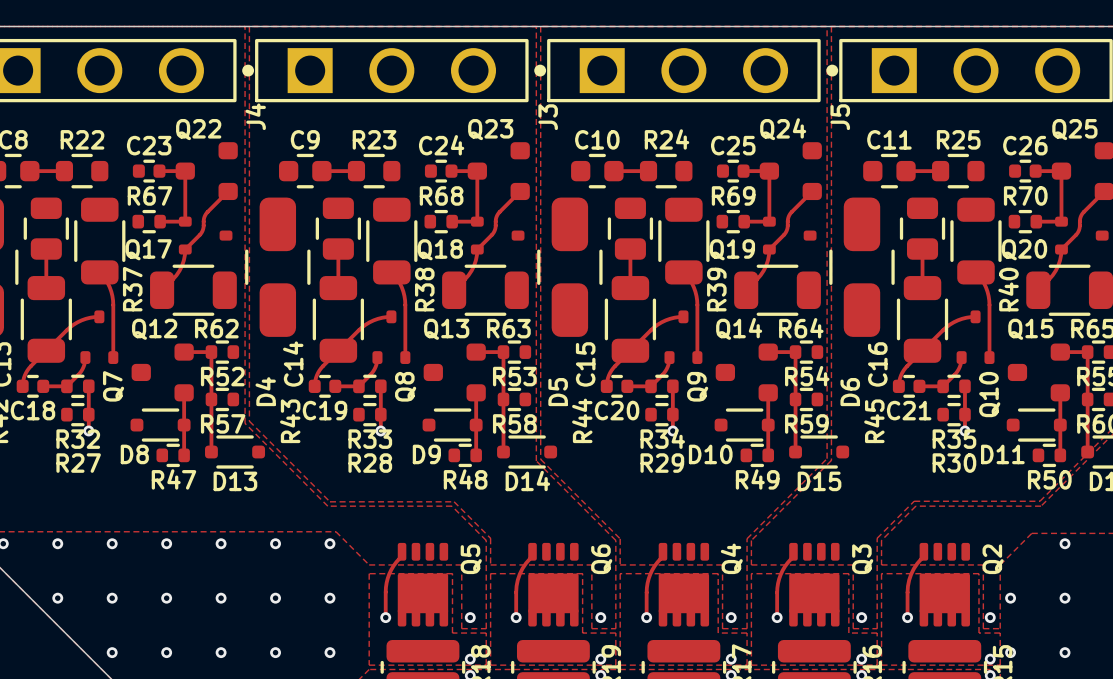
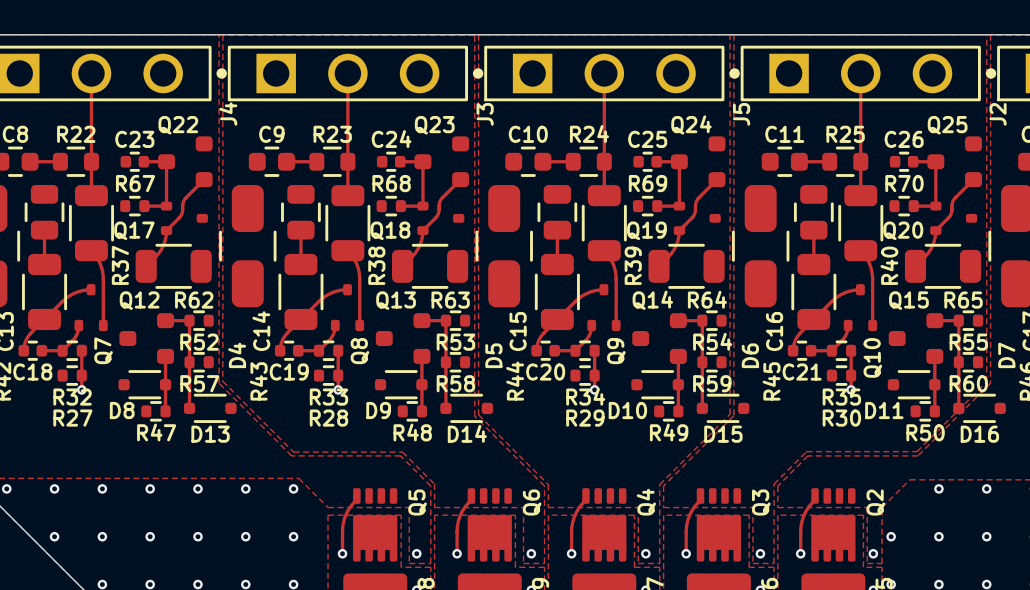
track: none -> (91, 73) (91, 195)
track: none -> (347, 73) (347, 195)
track: none -> (604, 73) (604, 195)
track: none -> (860, 73) (860, 195)

